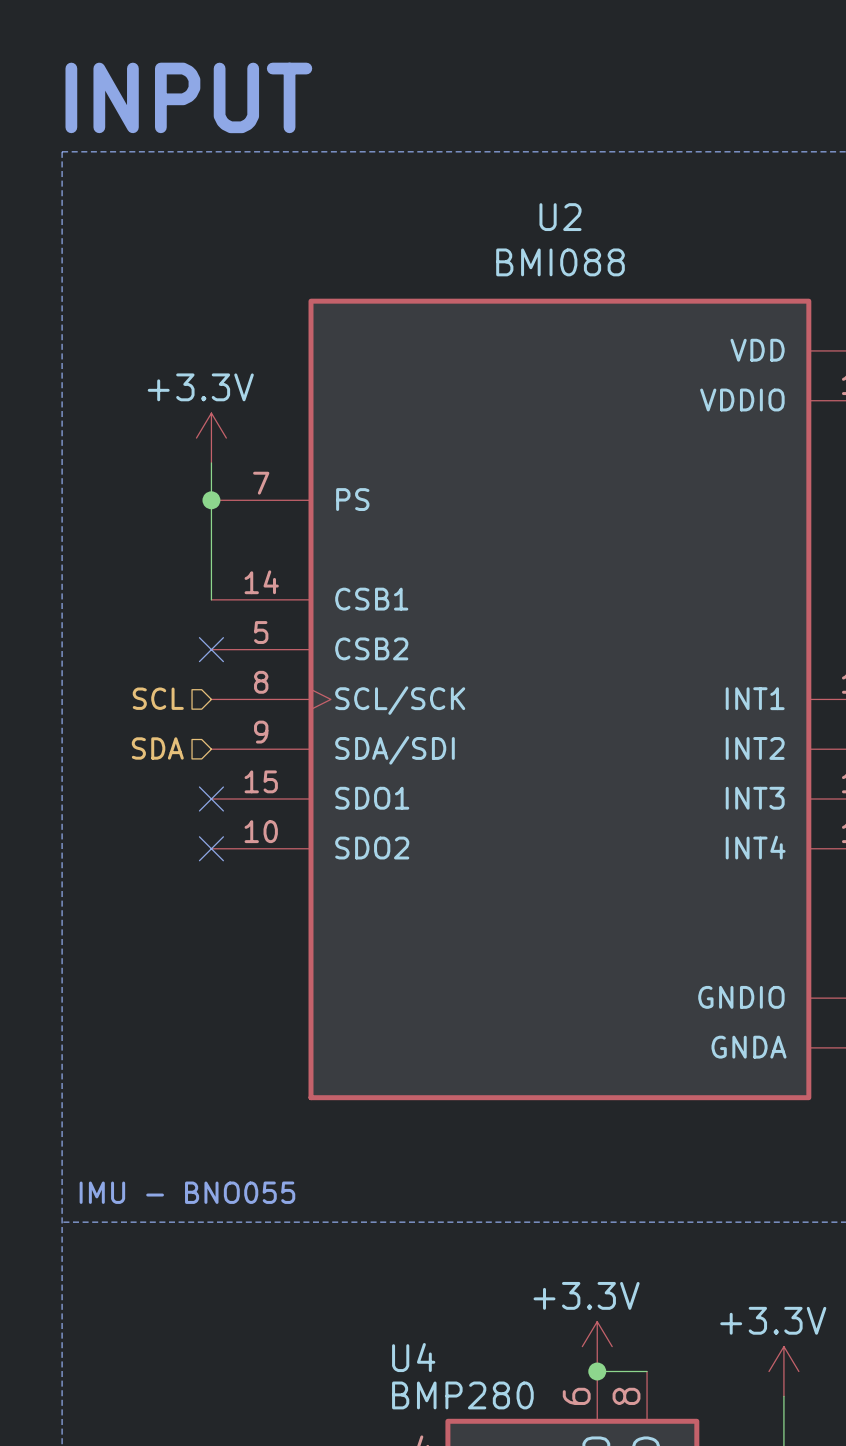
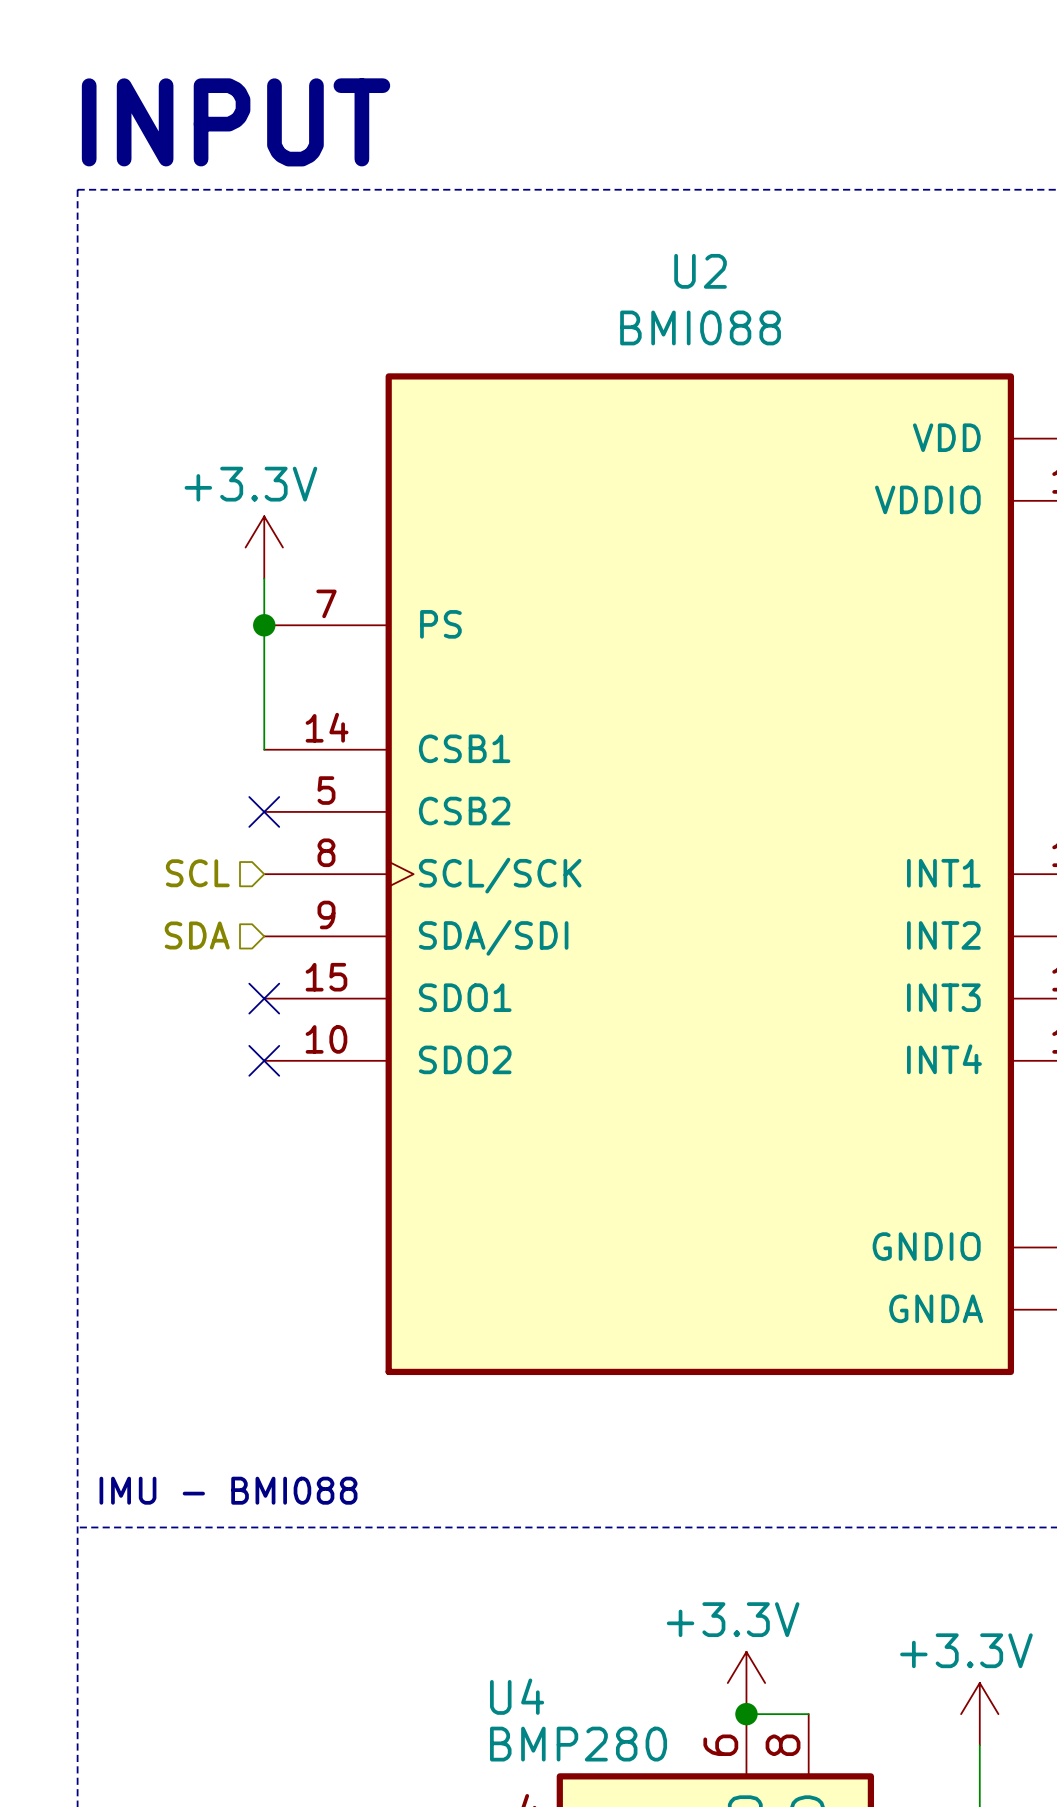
text: IMU - BNO055 (187, 1192) -> IMU - BMI088 (228, 1490)

